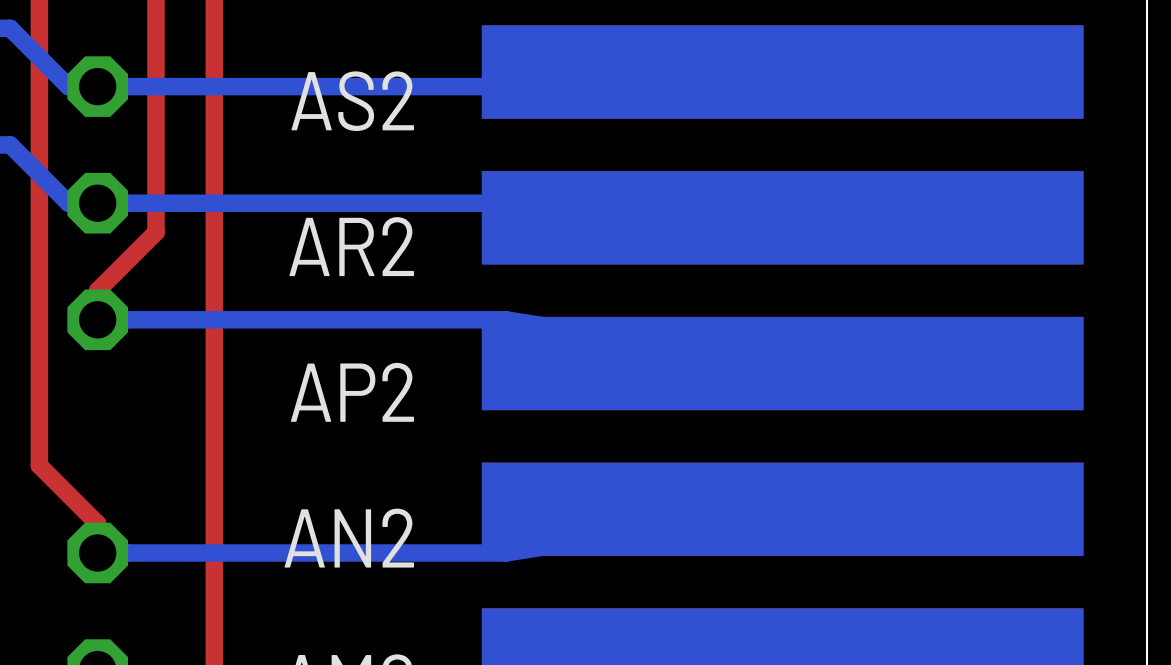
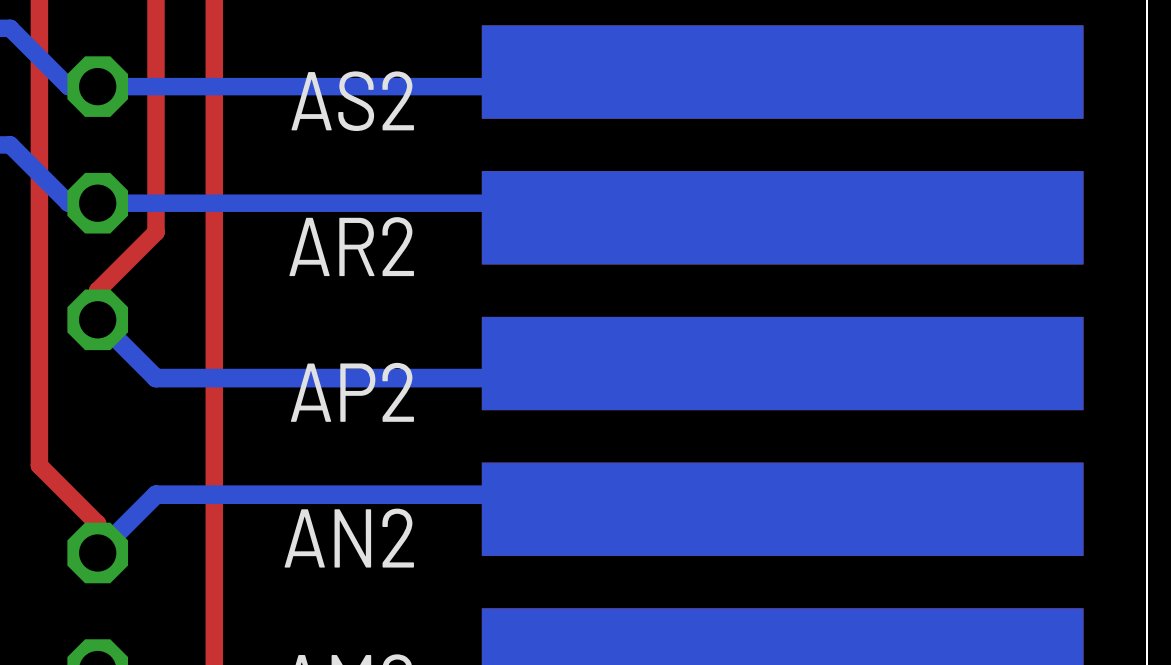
bottom track: (97, 319) (505, 319) (782, 363) -> (97, 319) (155, 378) (534, 378) (782, 363)
bottom track: (782, 509) (505, 552) (97, 552) -> (782, 509) (505, 494) (155, 494) (97, 552)

